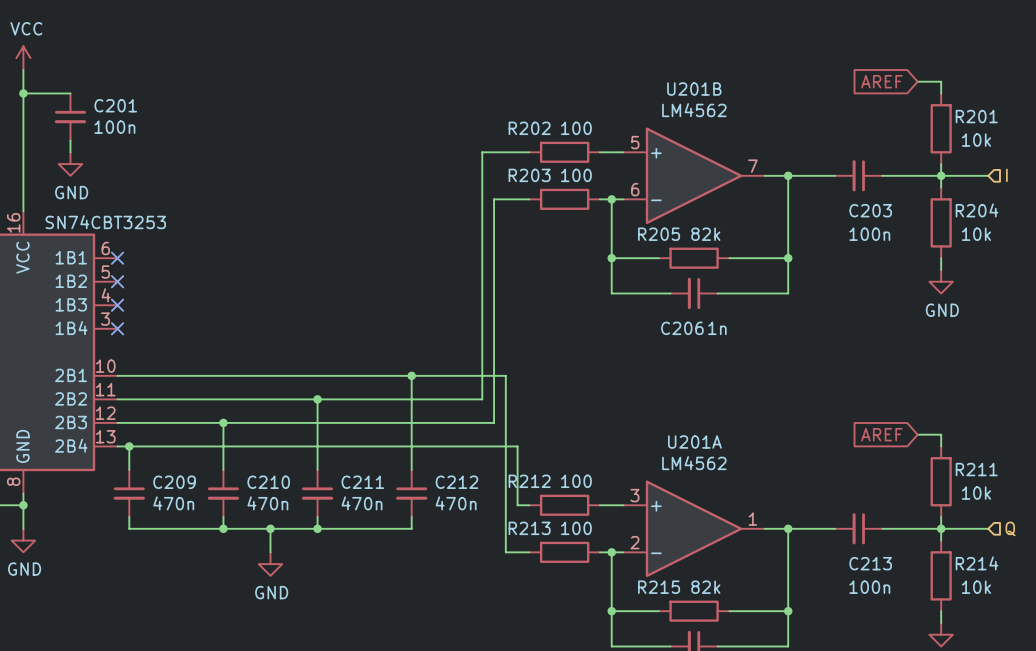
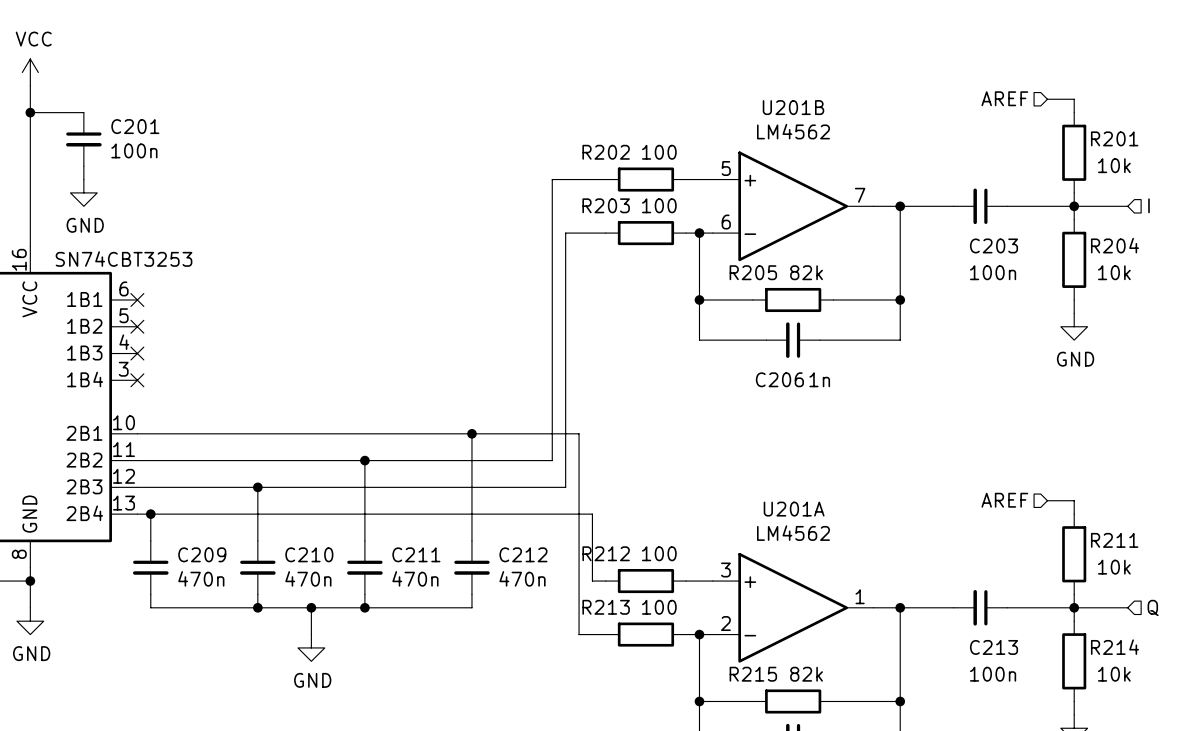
hierarchical label: none -> AREF (1004, 98)
global label: AREF (881, 81) -> none
hierarchical label: none -> AREF (1004, 500)
global label: AREF (881, 434) -> none

